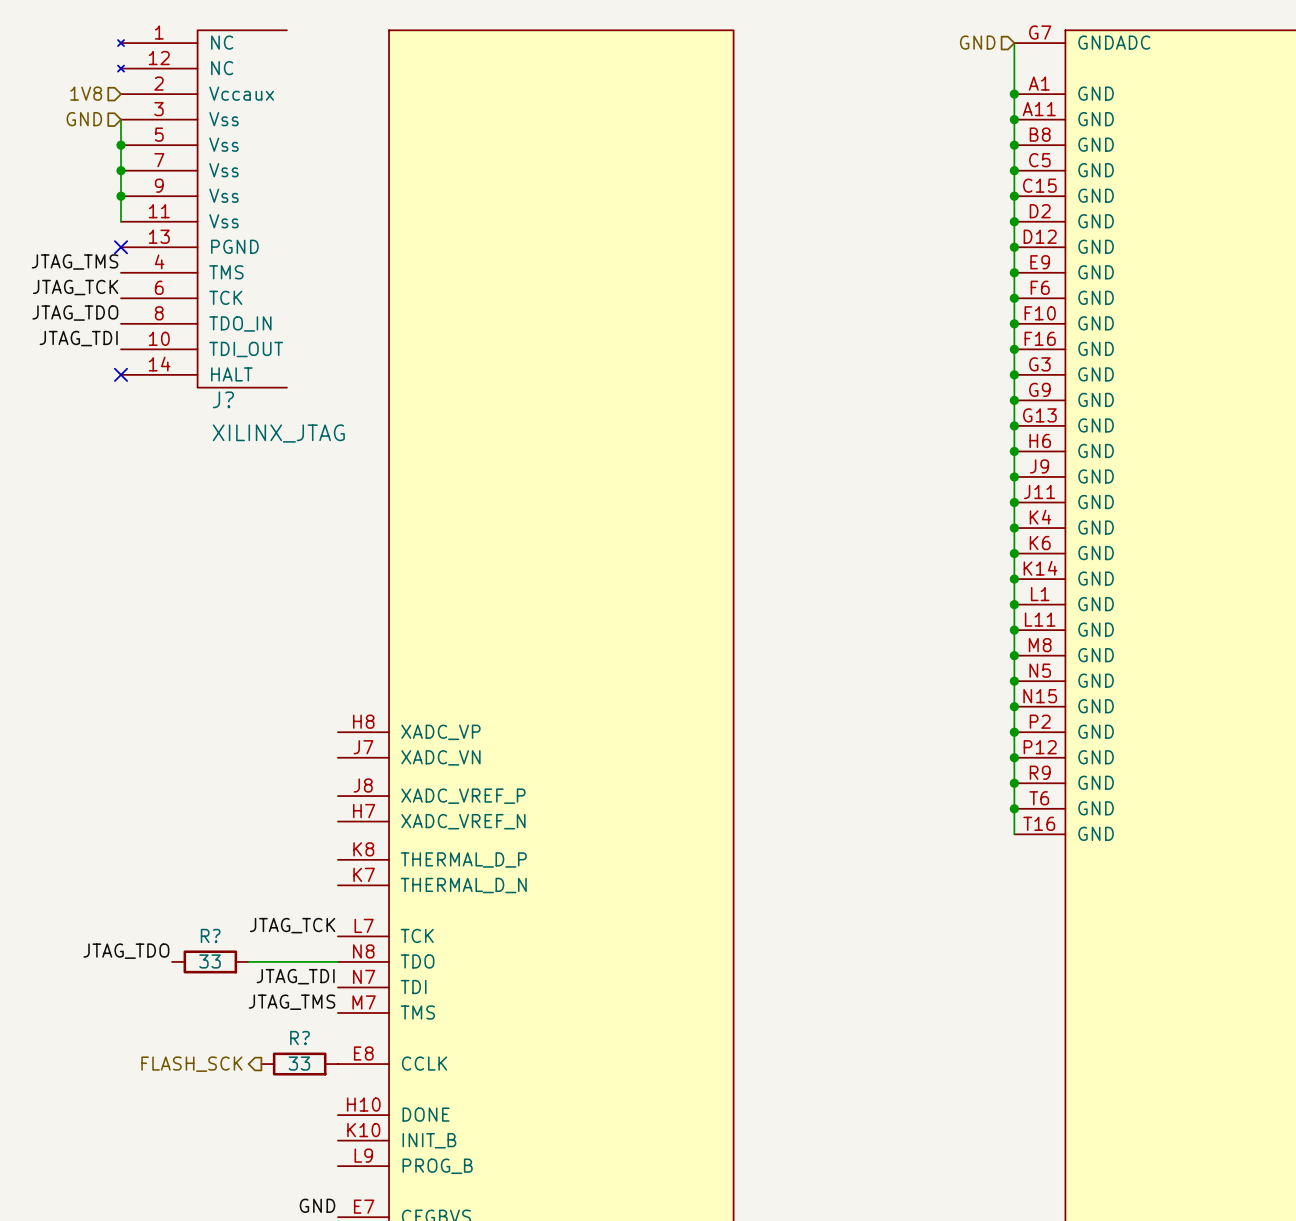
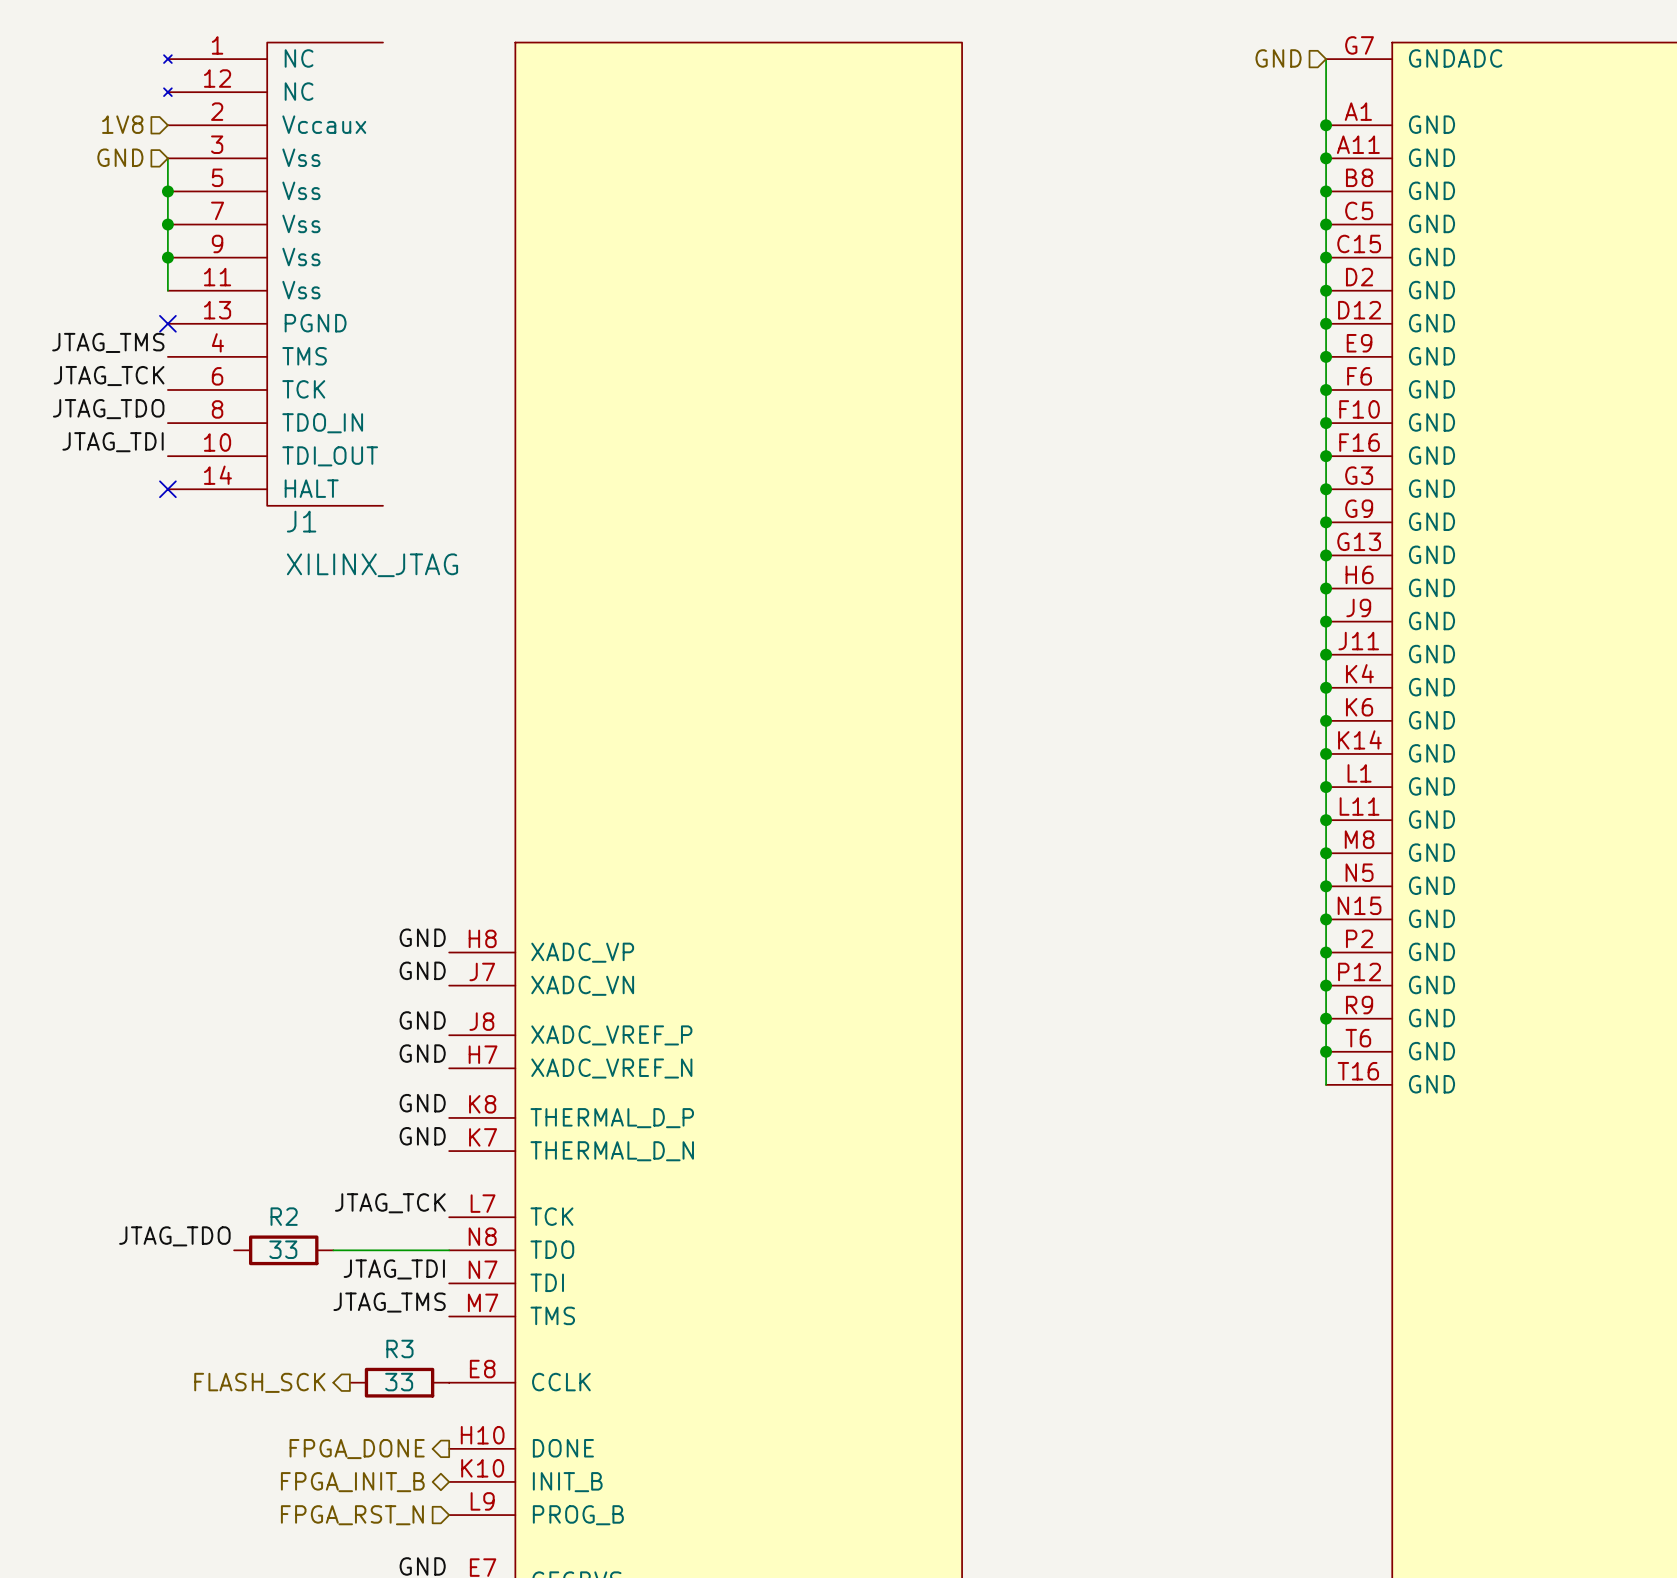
J? name: J? (223, 399) -> J1 (301, 521)
label: none -> GND (422, 937)
label: none -> GND (422, 970)
label: none -> GND (422, 1020)
label: none -> GND (422, 1053)
label: none -> GND (422, 1103)
label: none -> GND (422, 1136)
R? name: R? (210, 935) -> R2 (284, 1216)
R? name: R? (299, 1038) -> R3 (399, 1348)
hierarchical label: none -> FPGA_DONE (357, 1449)
hierarchical label: none -> FPGA_INIT_B (352, 1482)
hierarchical label: none -> FPGA_RST_N (352, 1515)

